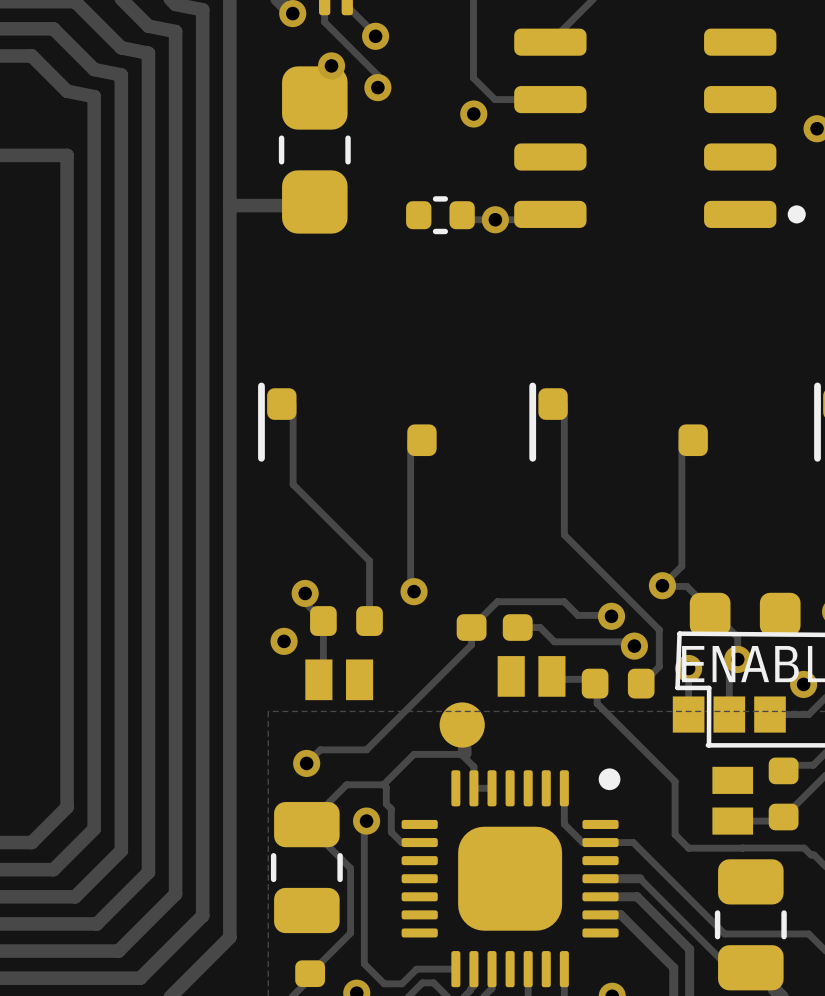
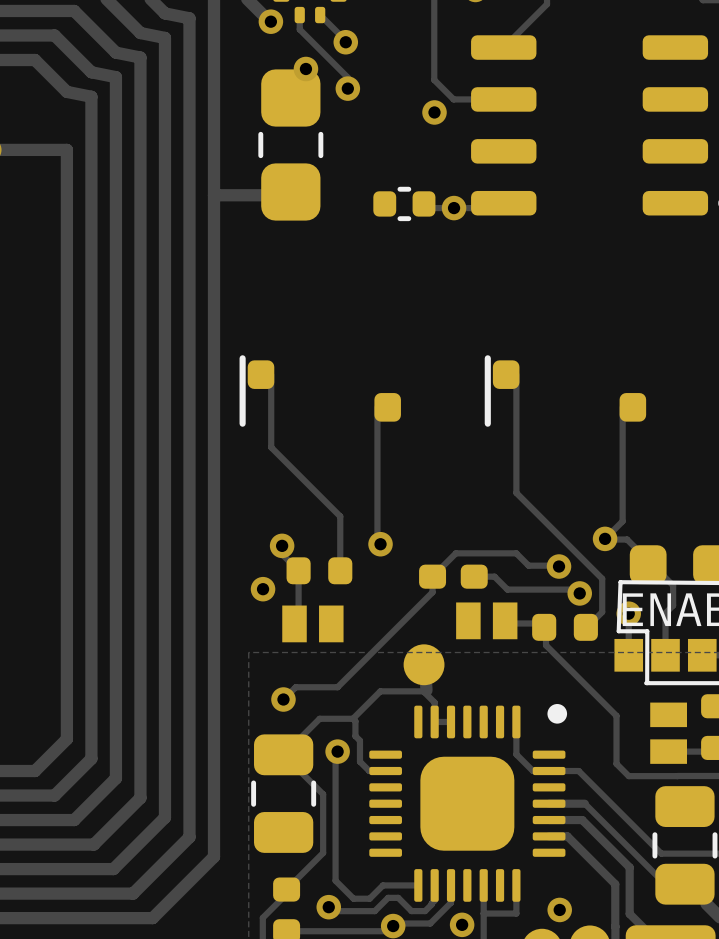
via: (737, 659) -> none

